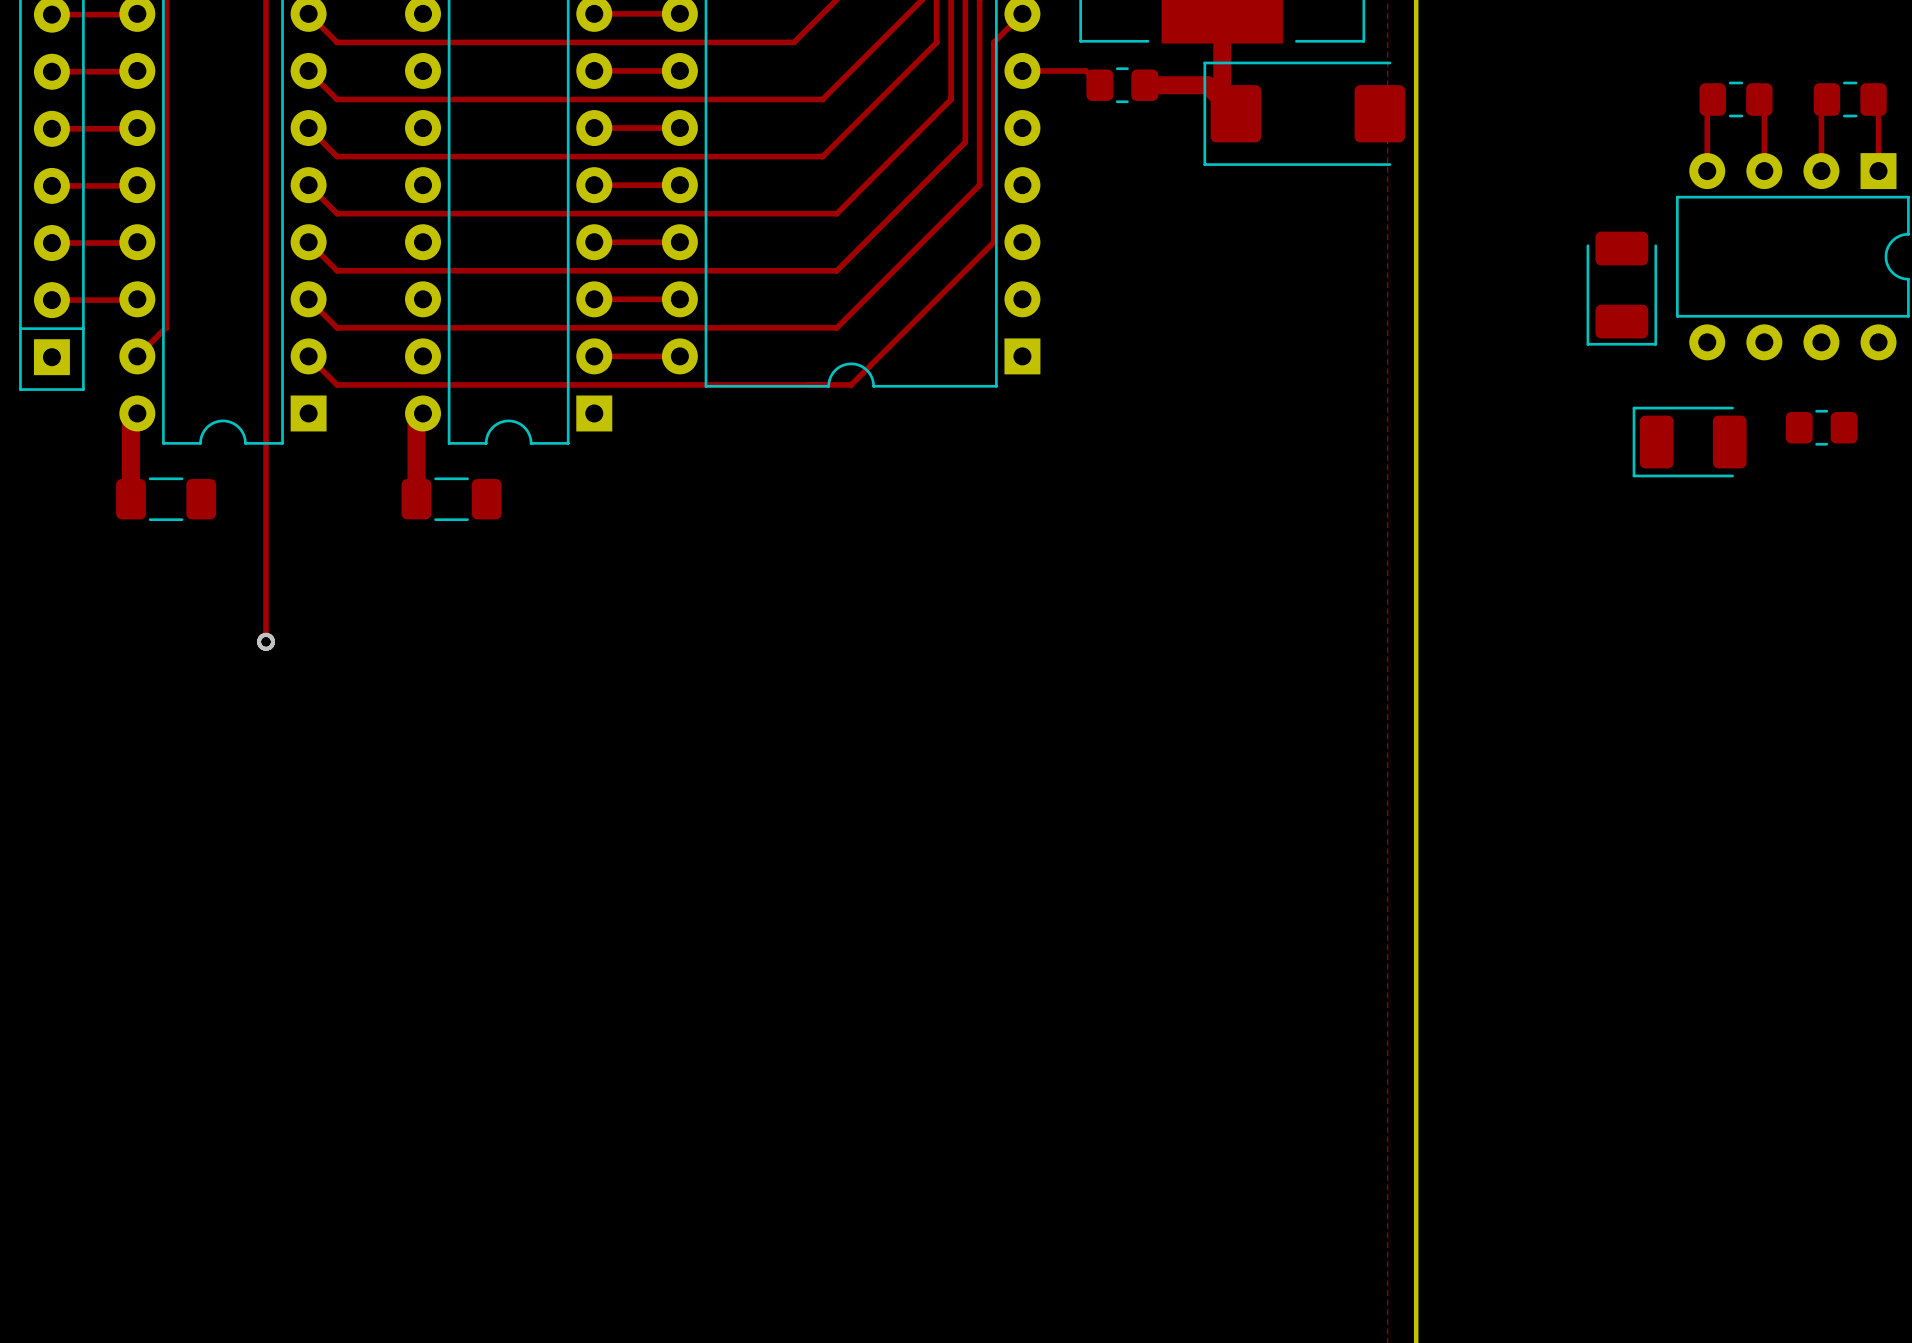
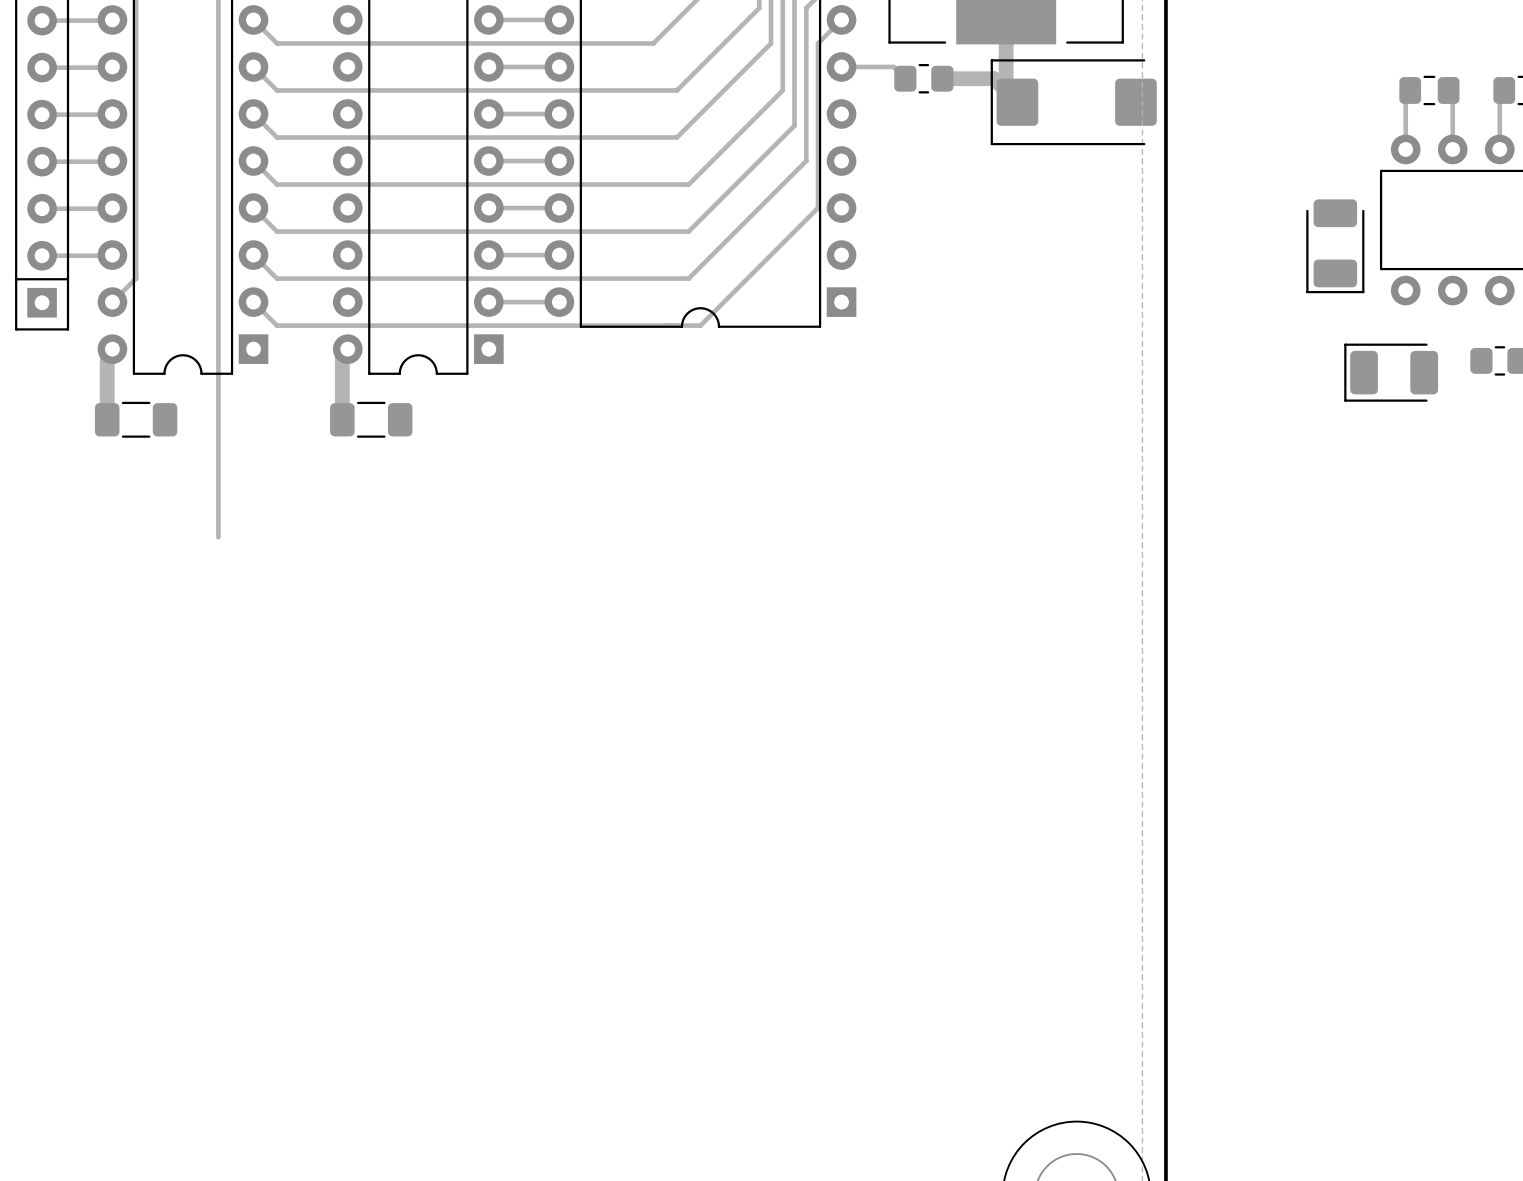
via: (266, 641) -> none

